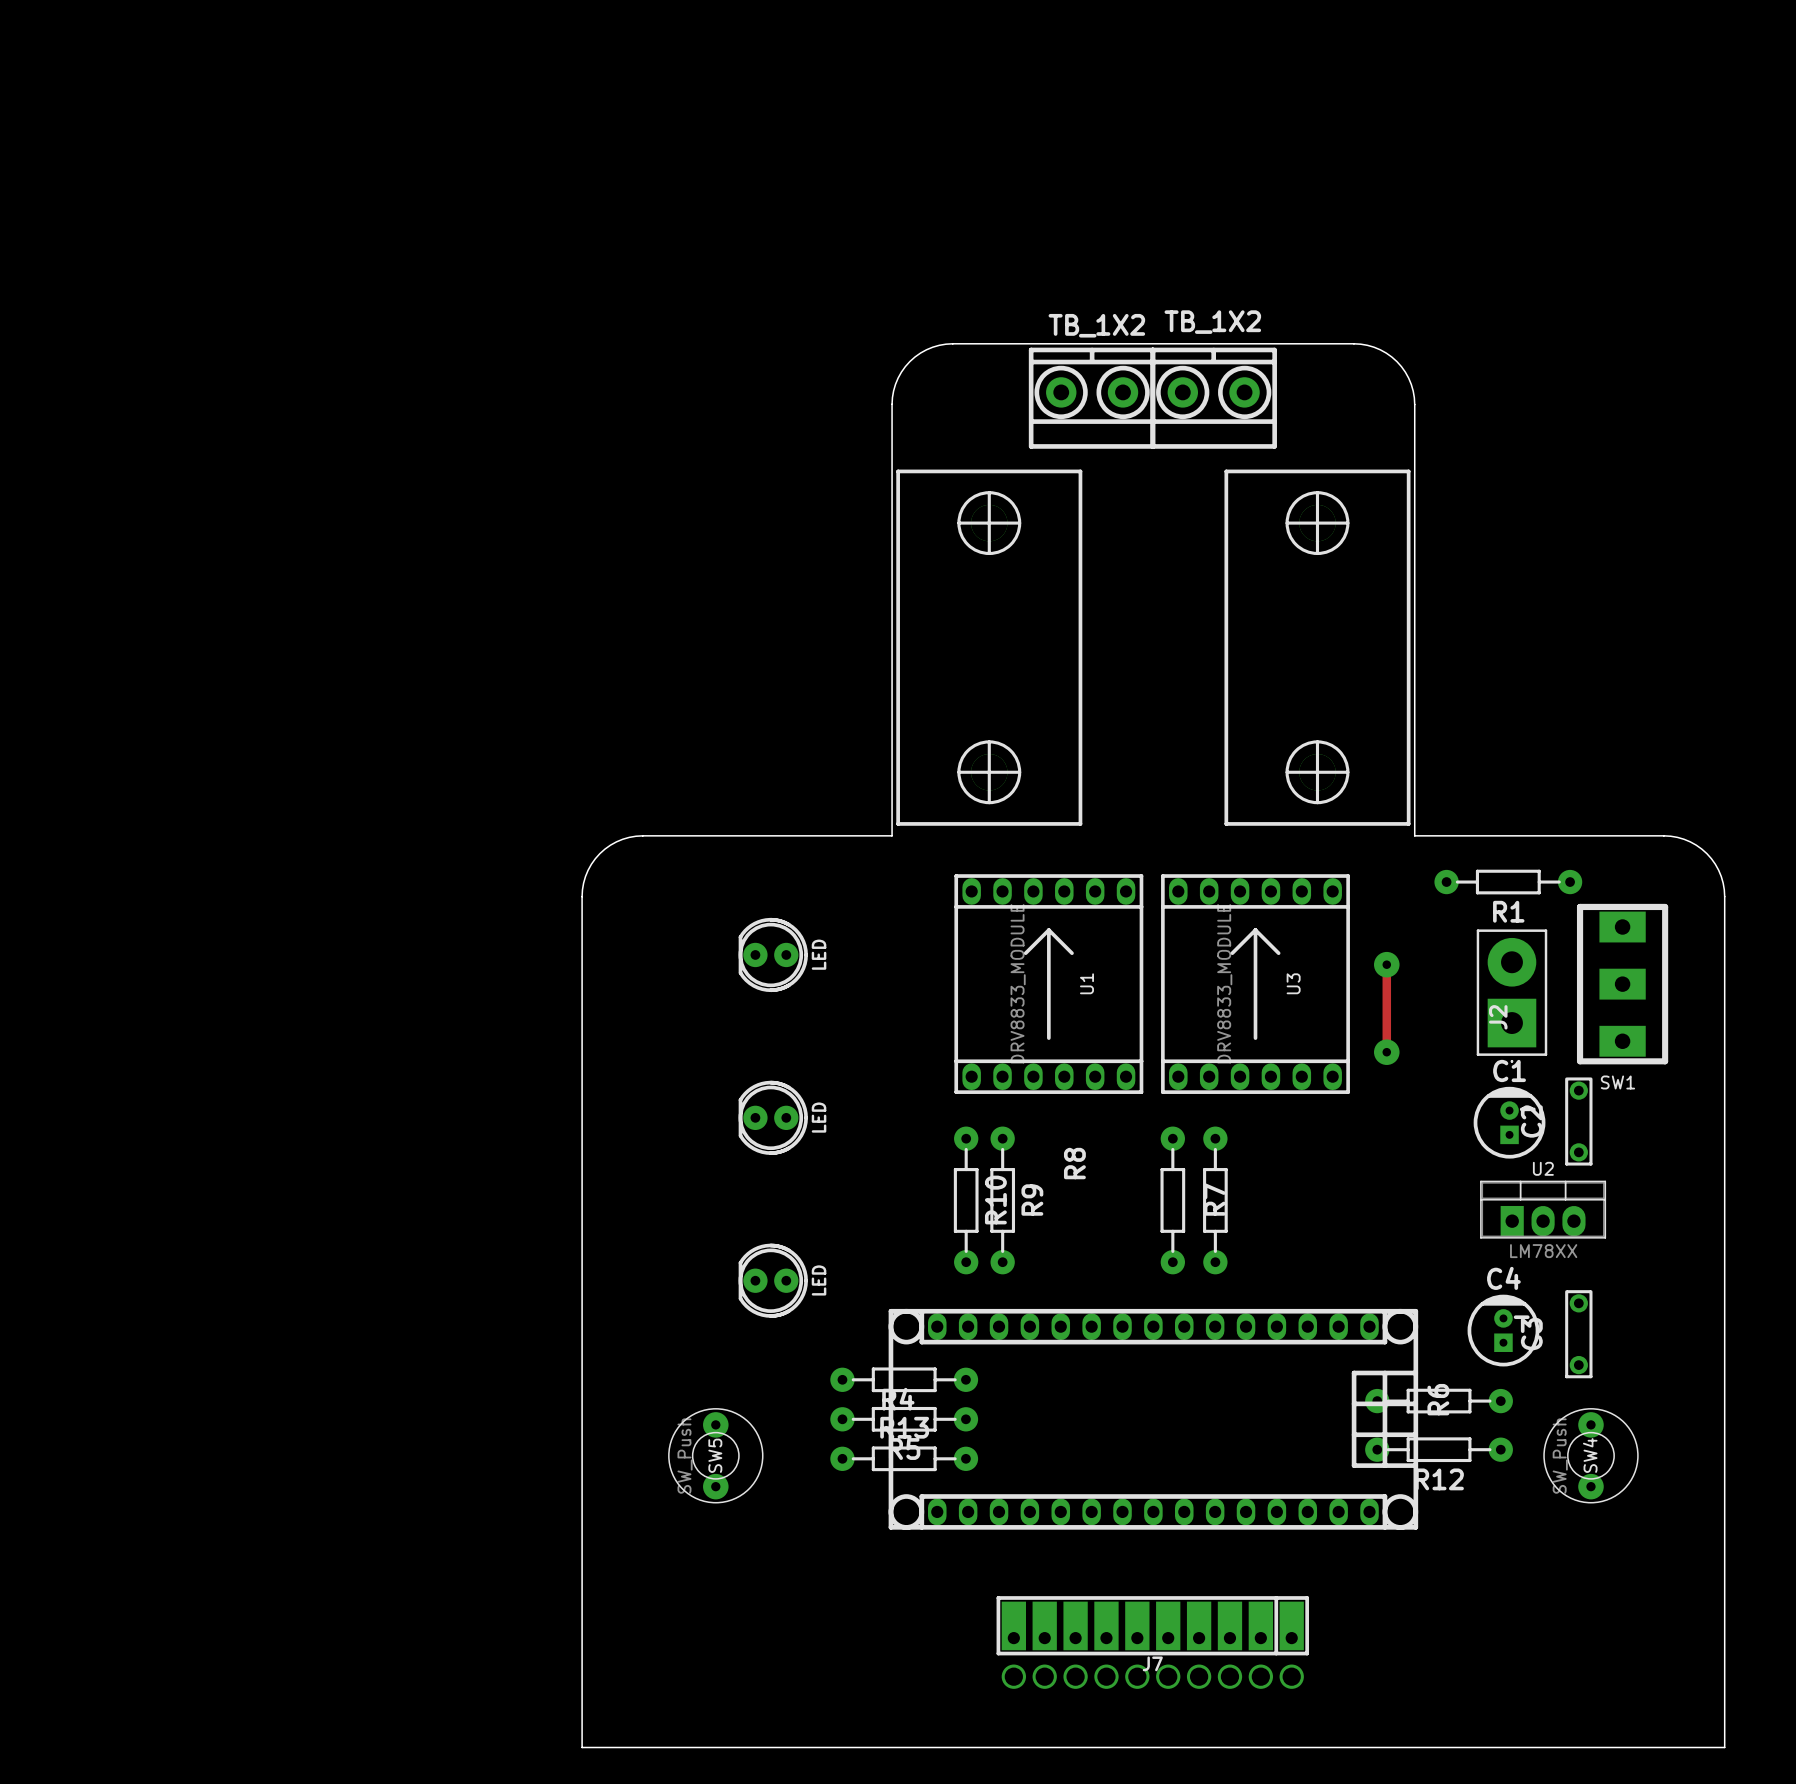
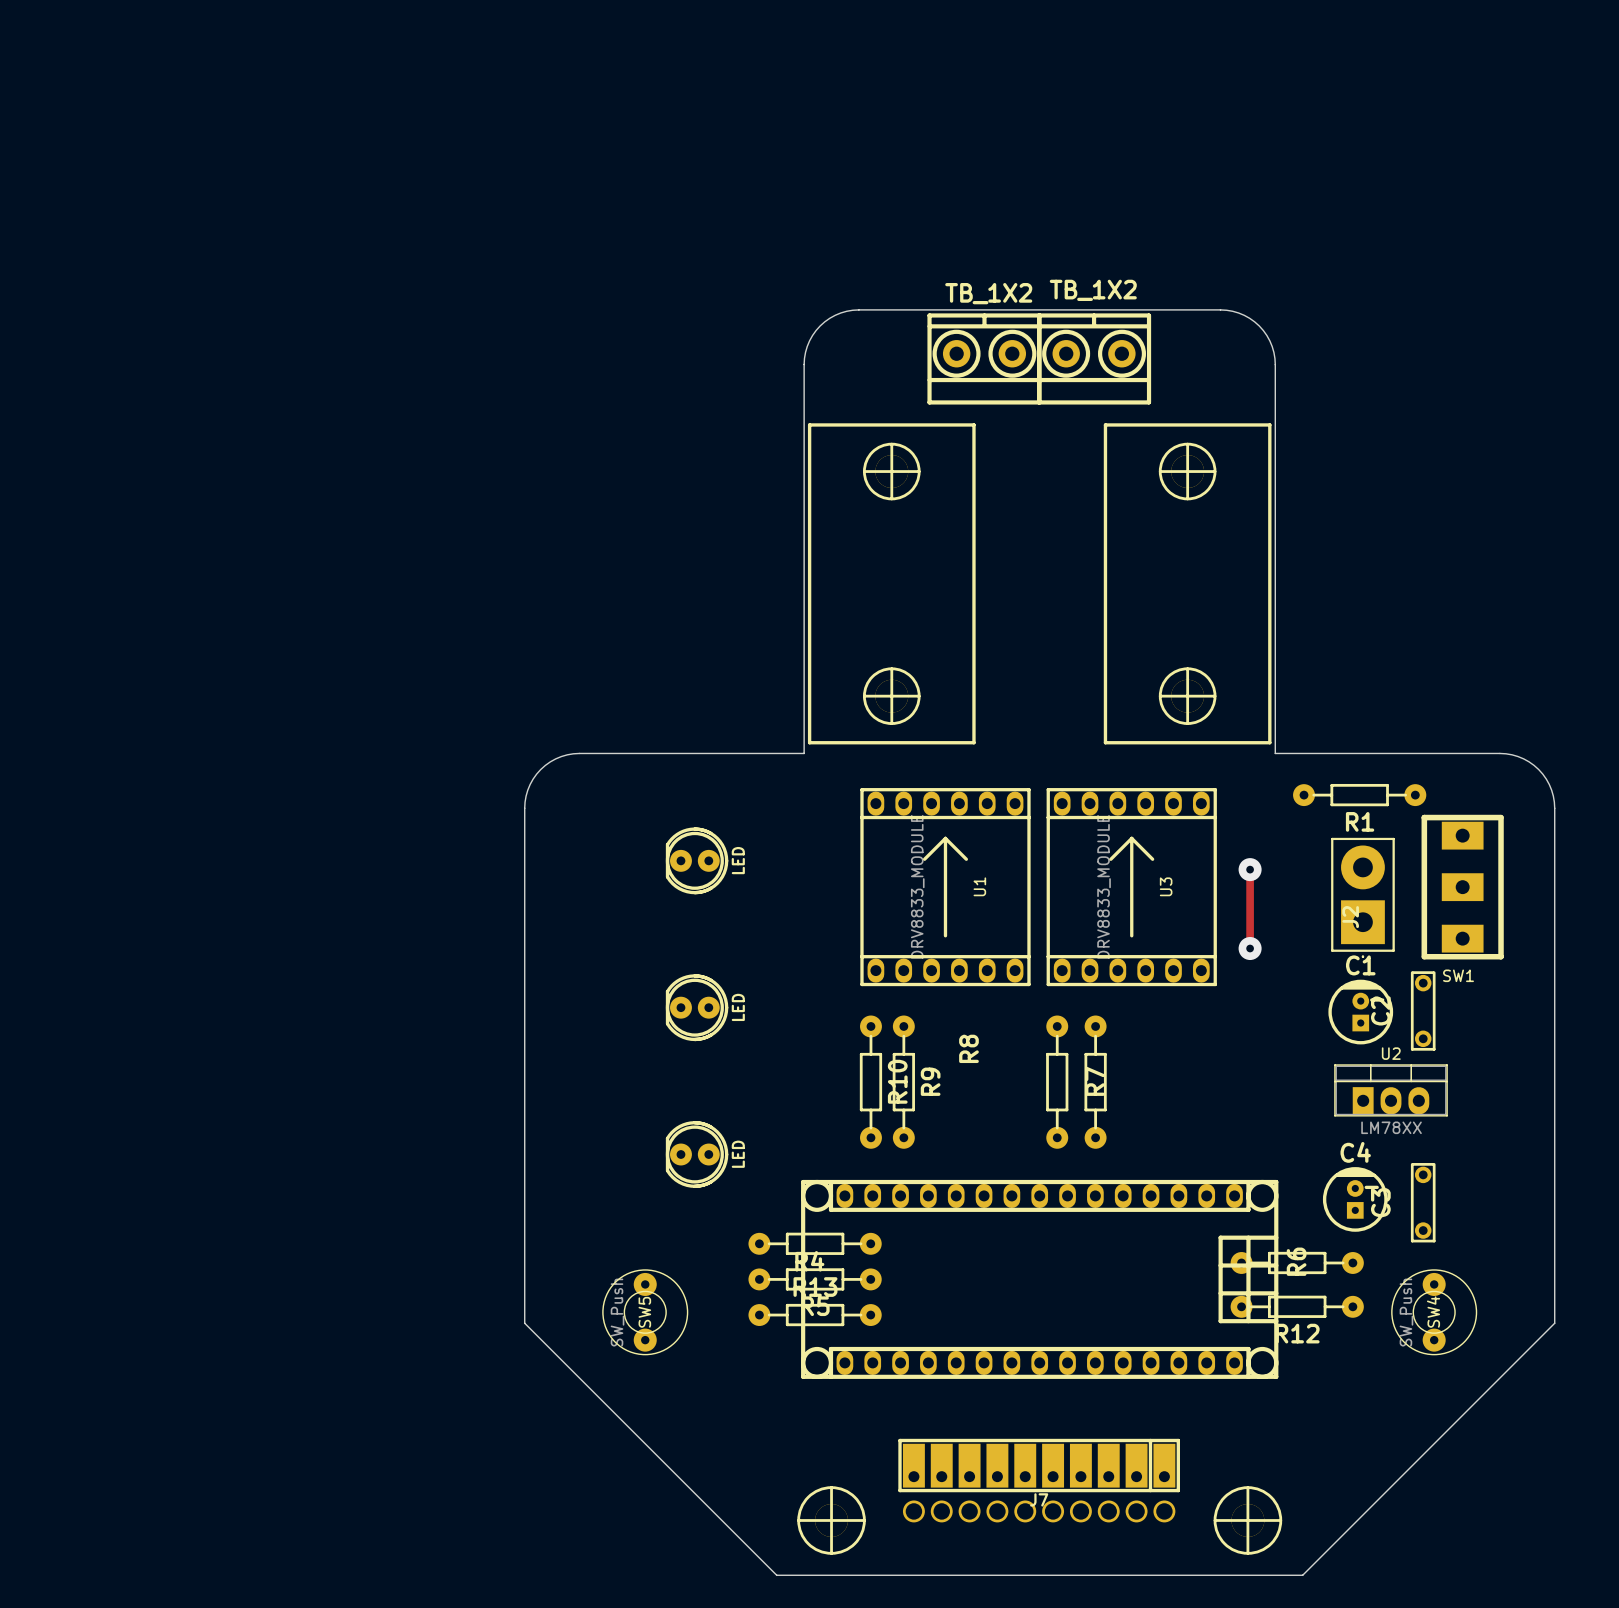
board edge: (582, 1467) (582, 1747) (861, 1747) -> (524, 1323) (776, 1575)
board edge: (1724, 1467) (1724, 1747) (1445, 1747) -> (1554, 1323) (1302, 1575)
part: none -> (831, 1520)
part: none -> (1247, 1520)

